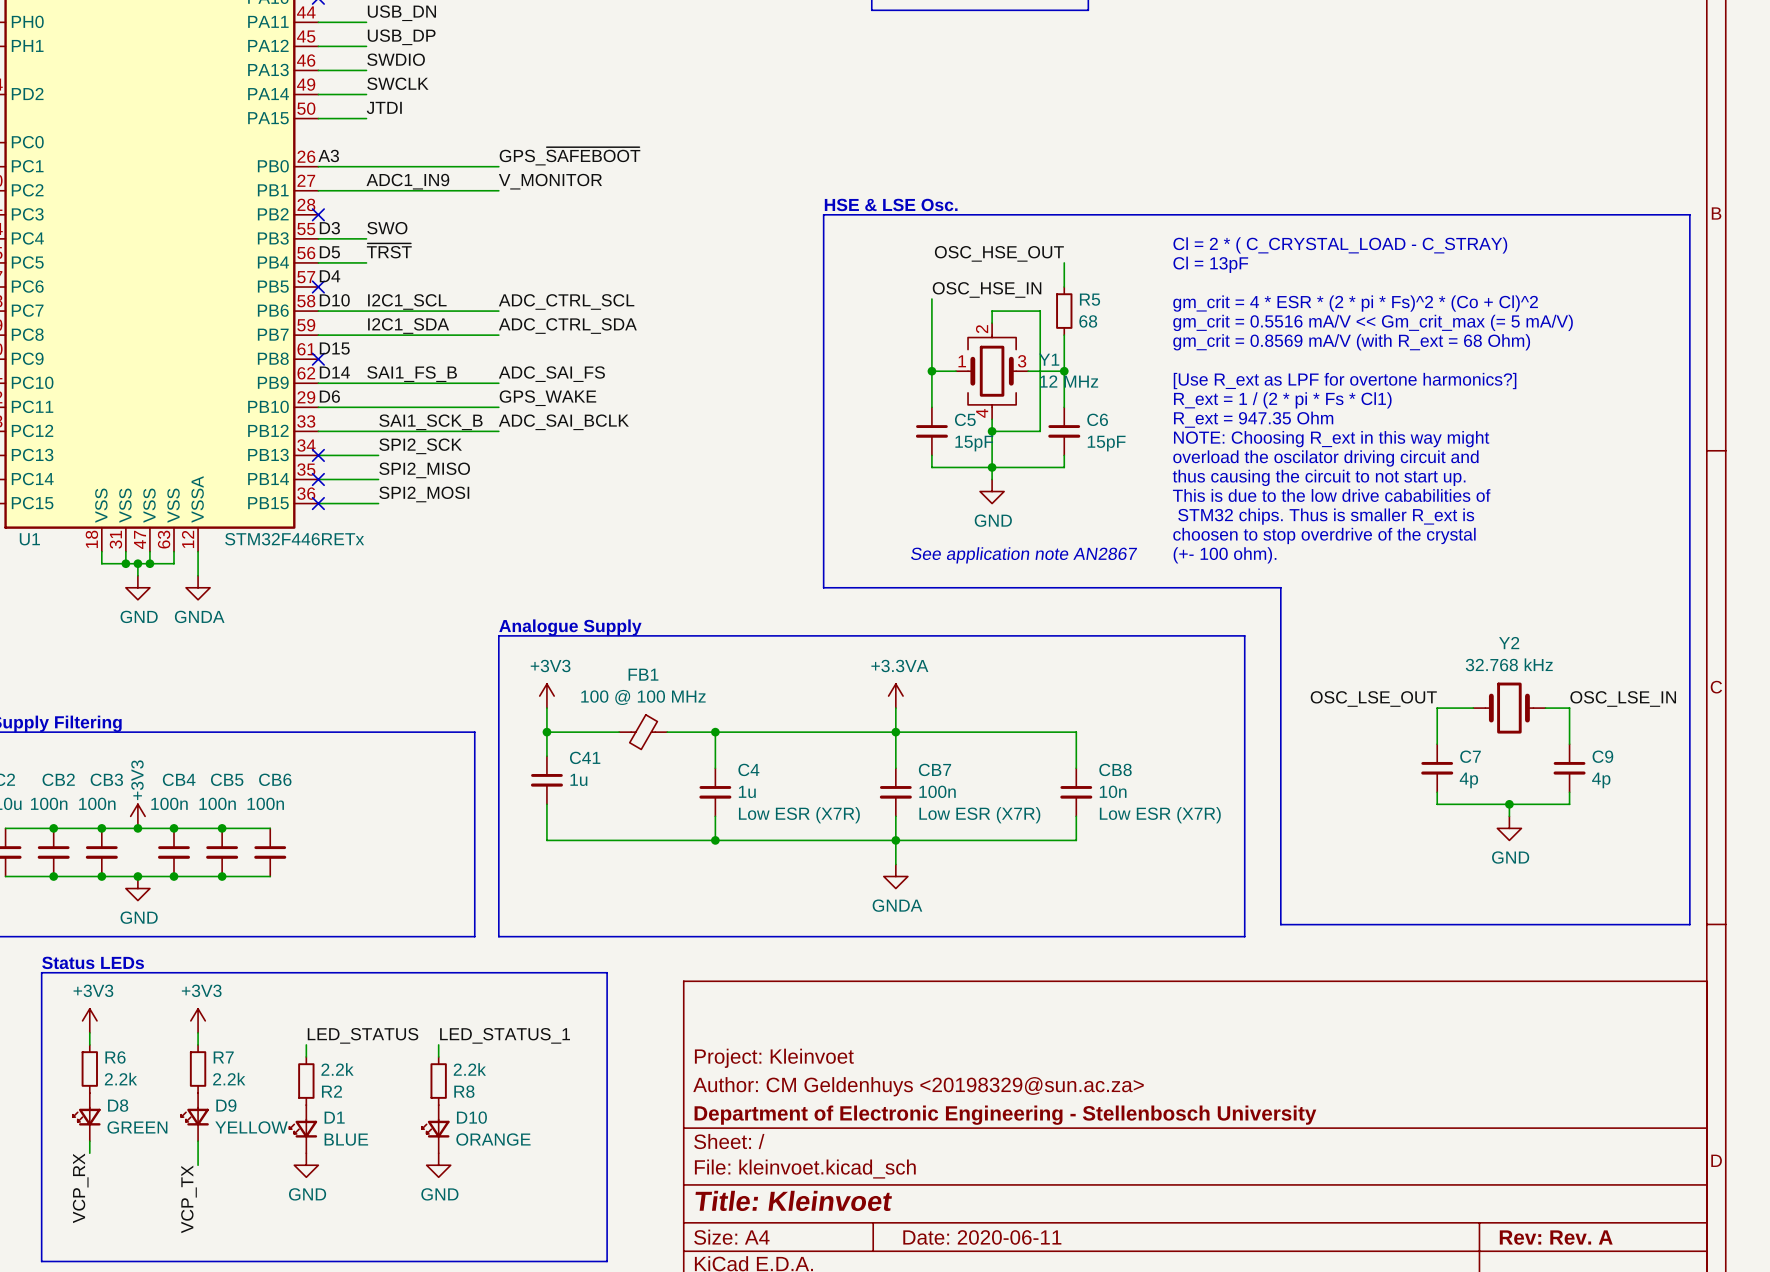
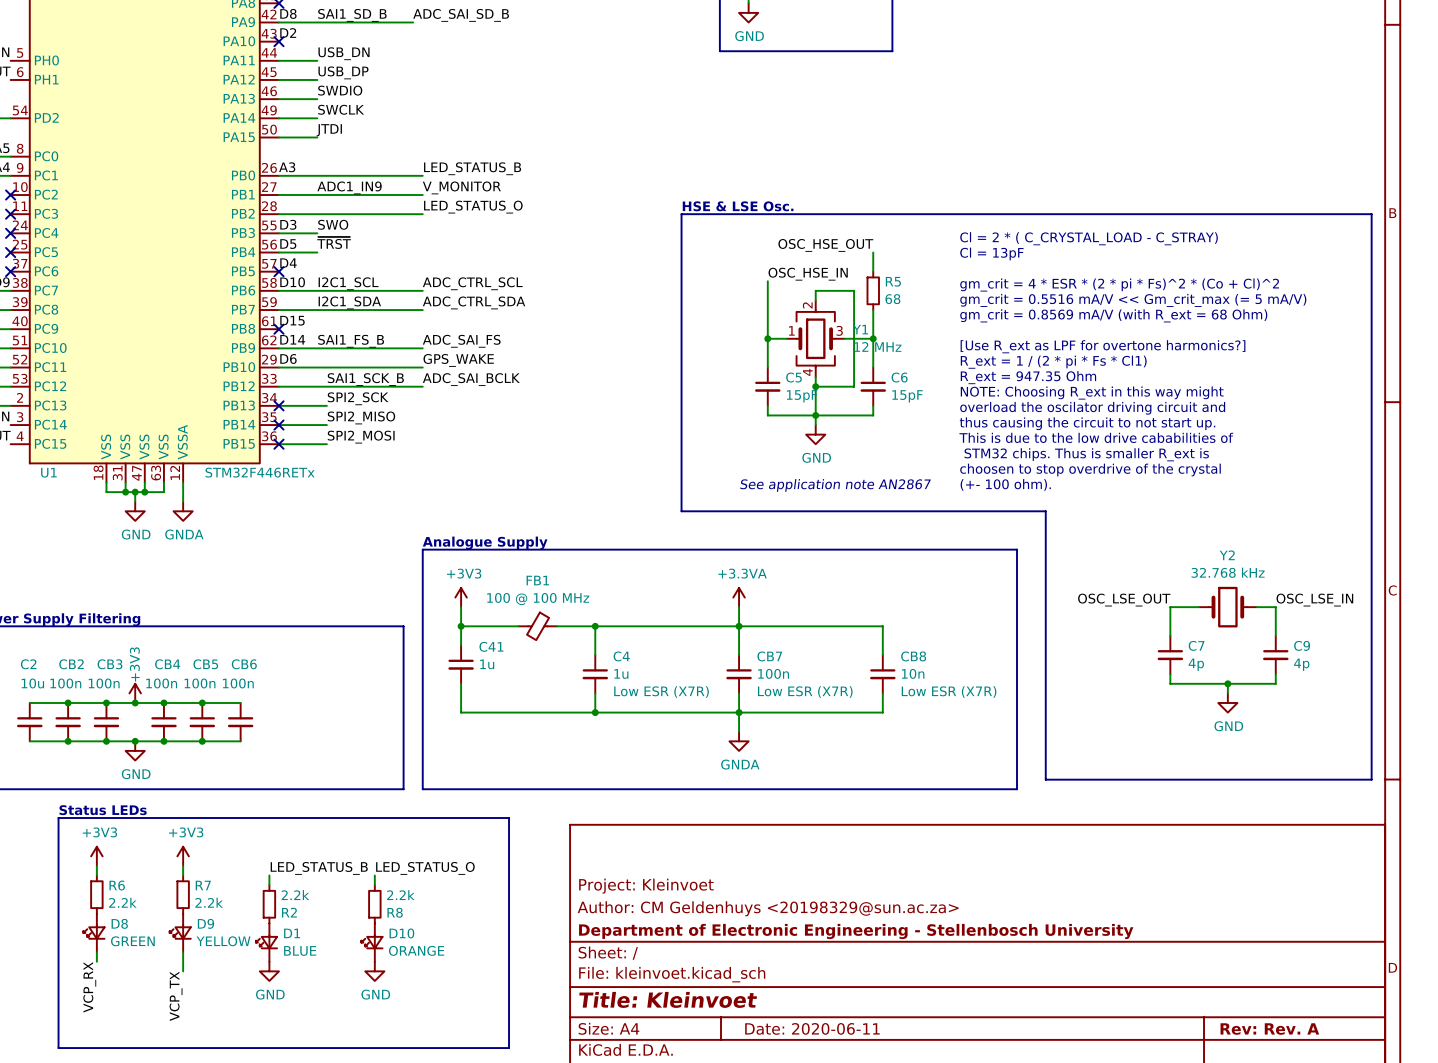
label: GPS_~{SAFEBOOT} (570, 156) -> LED_STATUS_B (472, 168)
label: none -> LED_STATUS_O (473, 207)
wire: none -> (278, 214) (422, 214)
no-connect mark: (318, 214) -> none
label: LED_STATUS (363, 1035) -> LED_STATUS_B (319, 868)
label: LED_STATUS_1 (505, 1035) -> LED_STATUS_O (425, 868)

